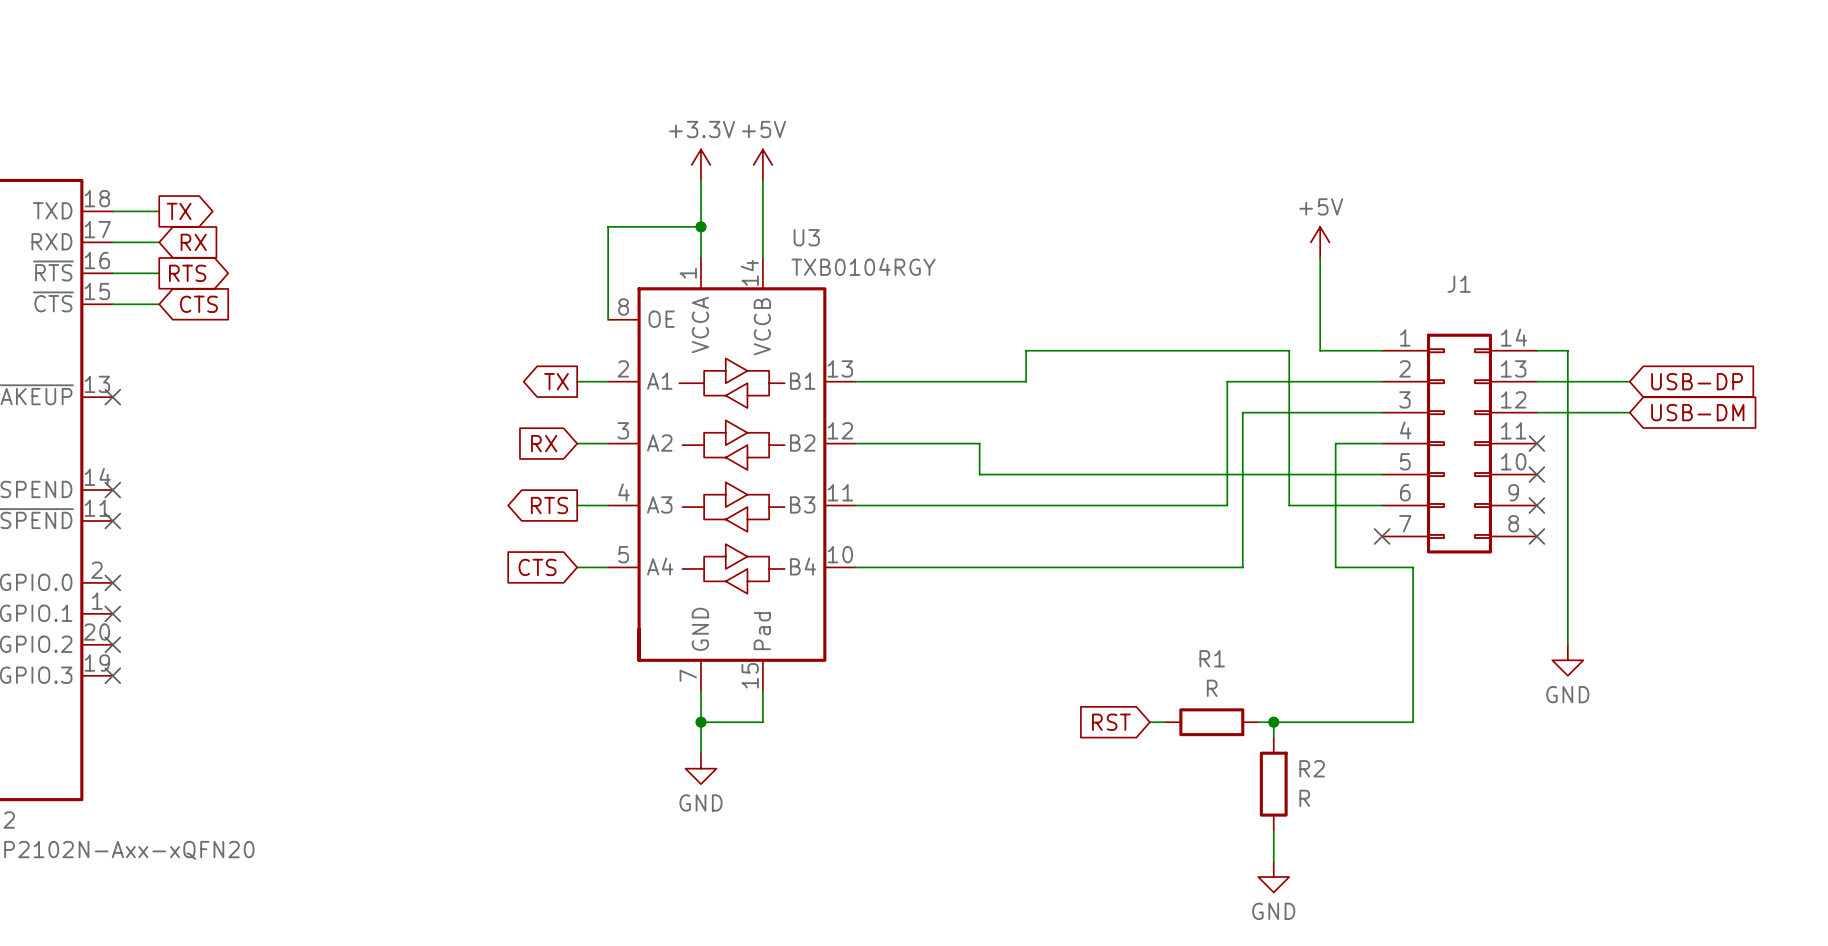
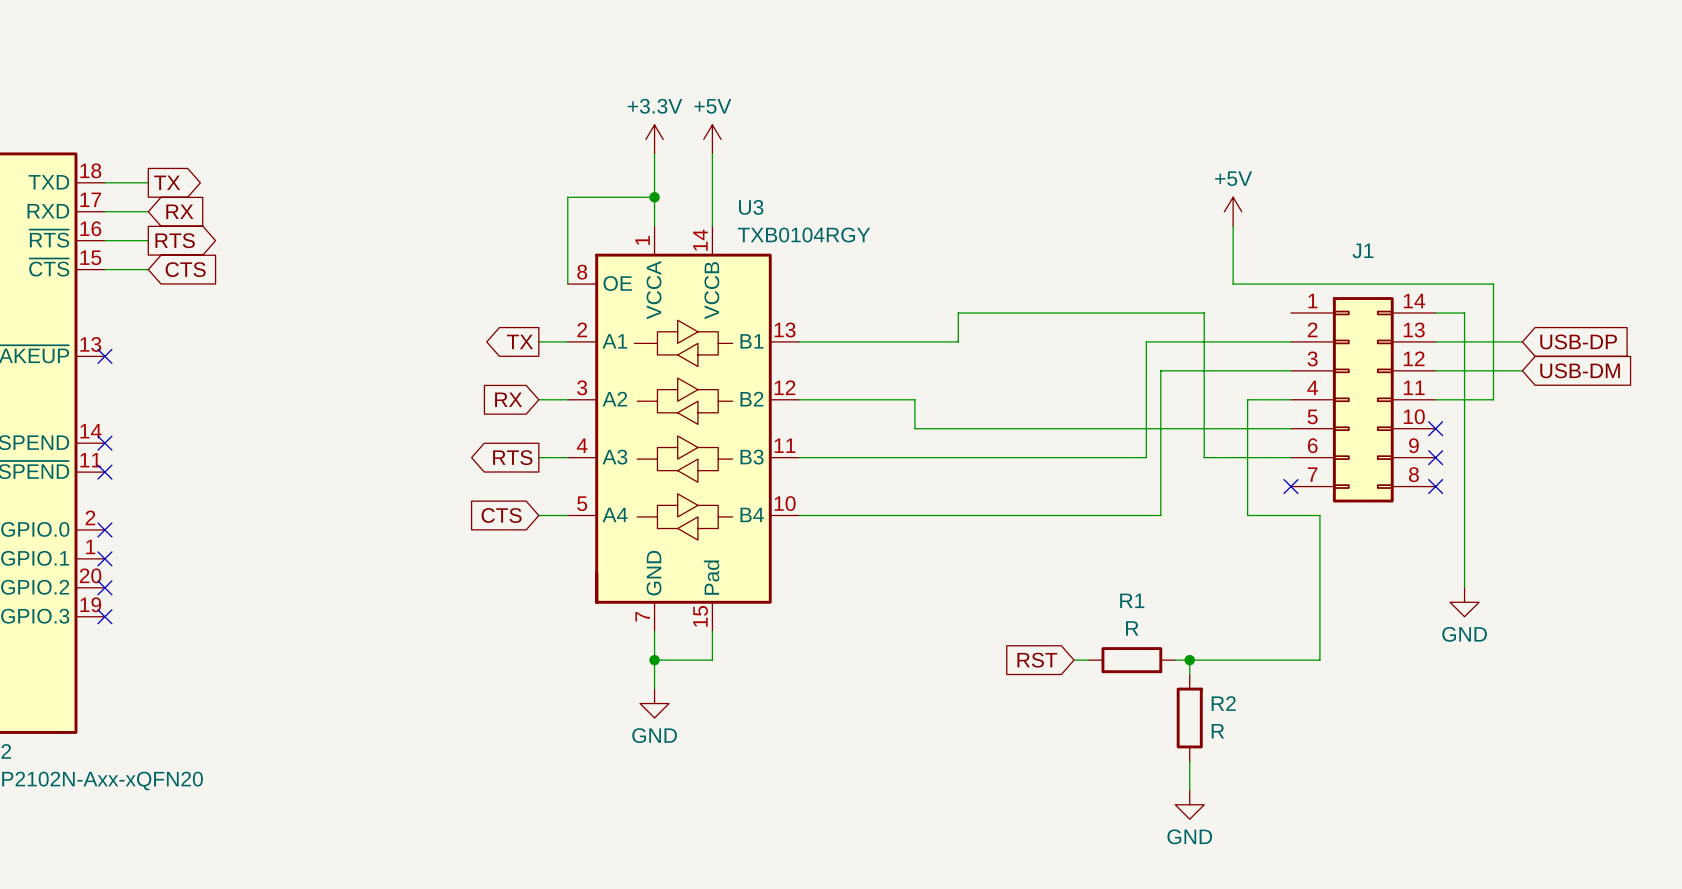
wire: (1320, 319) (1320, 350) (1382, 350) -> (1233, 284) (1493, 284) (1493, 399) (1435, 399)
no-connect mark: (1536, 443) -> none

